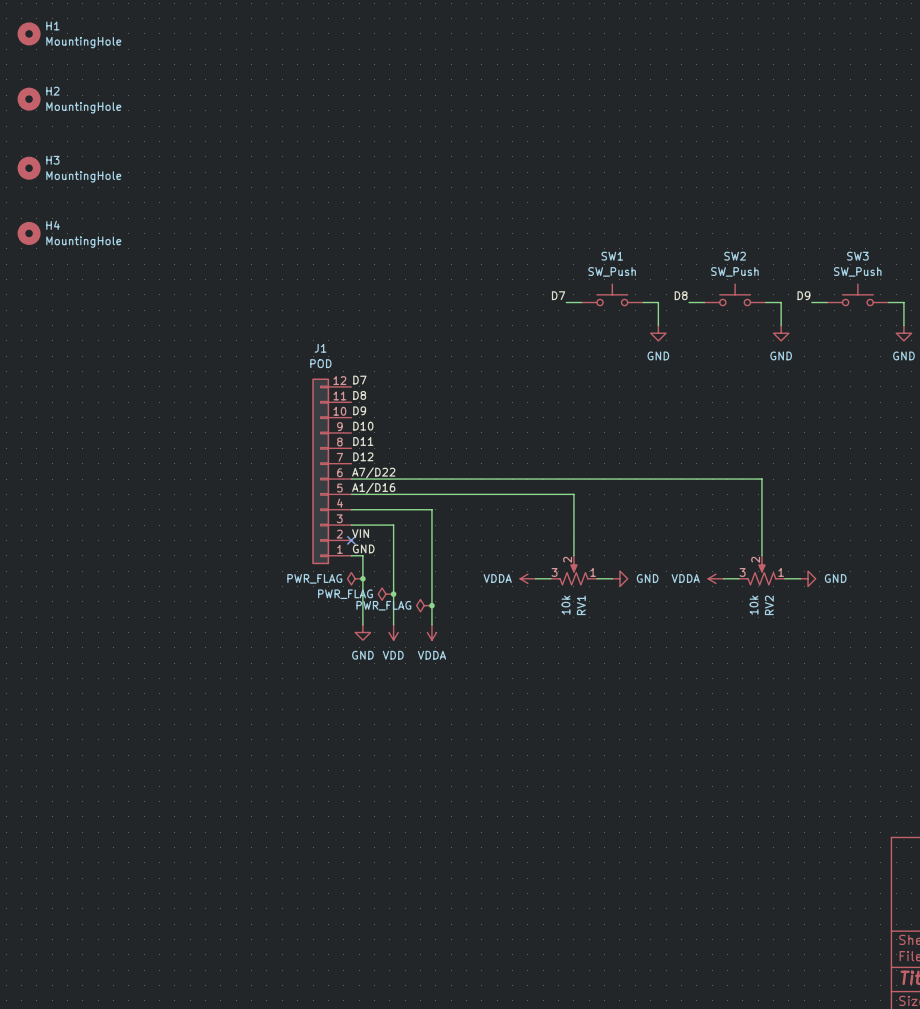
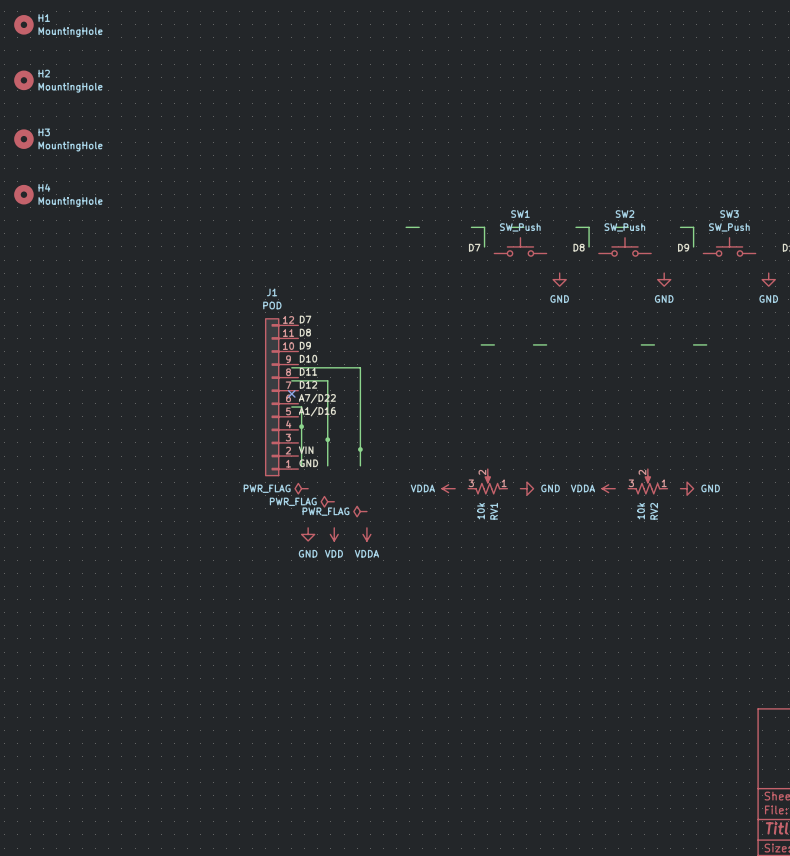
wire: (566, 302) (581, 302) -> (406, 227) (419, 227)
wire: (643, 302) (658, 302) (658, 325) -> (471, 227) (484, 227) (484, 246)
wire: (689, 302) (704, 302) -> (510, 227) (523, 227)
wire: (765, 302) (781, 302) (781, 325) -> (575, 227) (589, 227) (589, 246)
wire: (811, 302) (827, 302) -> (615, 227) (628, 227)
wire: (888, 302) (903, 302) (903, 325) -> (680, 227) (693, 227) (693, 246)
wire: none -> (481, 344) (494, 344)
wire: none -> (533, 344) (546, 344)
wire: none -> (641, 344) (654, 344)
wire: none -> (693, 344) (706, 344)
wire: none -> (291, 367) (360, 367) (360, 465)
no-connect mark: none -> (291, 393)
wire: (351, 479) (761, 479) (761, 555) -> none
wire: (351, 494) (573, 494) (573, 555) -> none
junction: none -> (301, 426)
wire: (351, 509) (431, 509) (431, 624) -> none
junction: none -> (327, 439)
wire: (351, 525) (393, 525) (393, 624) -> (291, 380) (327, 380) (327, 465)
junction: none -> (360, 449)
no-connect mark: (351, 540) -> none
wire: (351, 555) (362, 555) (362, 624) -> (291, 407) (301, 407) (301, 465)
junction: (362, 578) -> none
wire: (535, 578) (550, 578) -> none
wire: (596, 578) (612, 578) -> none
wire: (723, 578) (738, 578) -> none
wire: (784, 578) (800, 578) -> none
junction: (393, 594) -> none
junction: (431, 605) -> none

